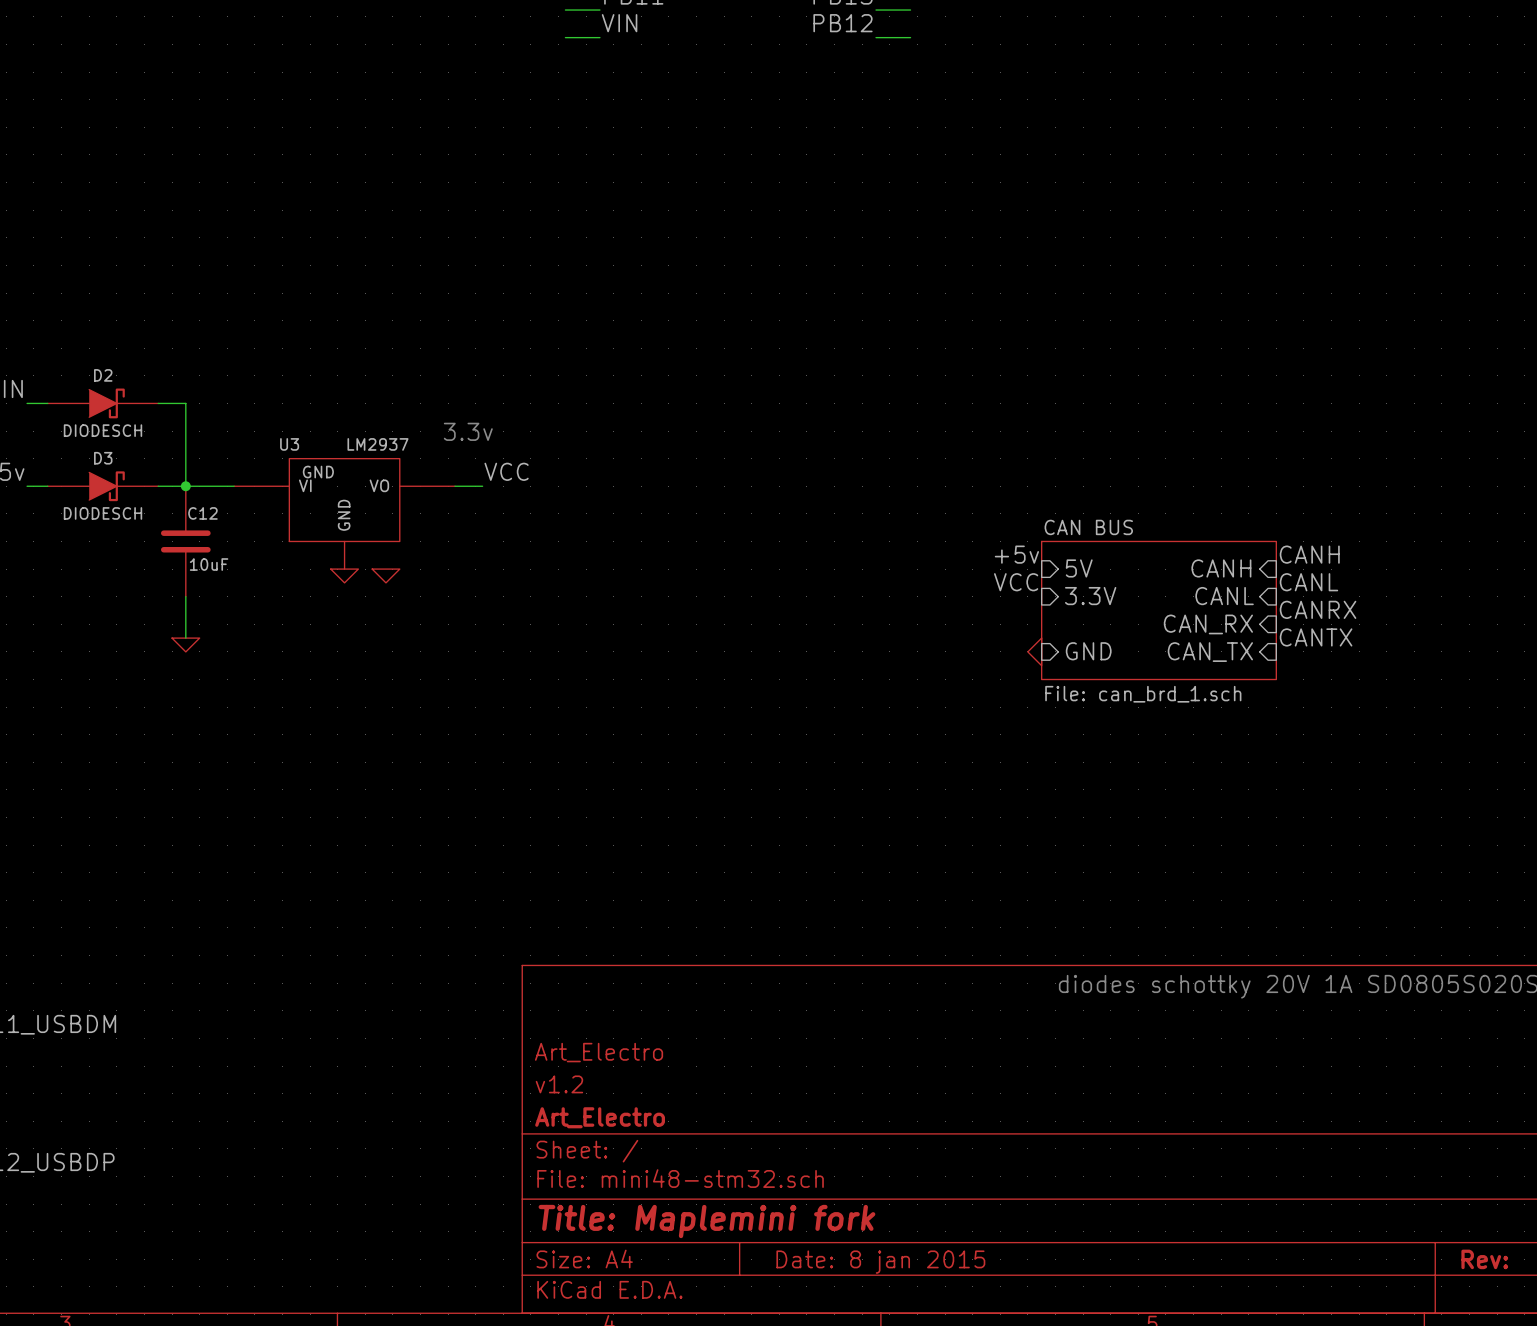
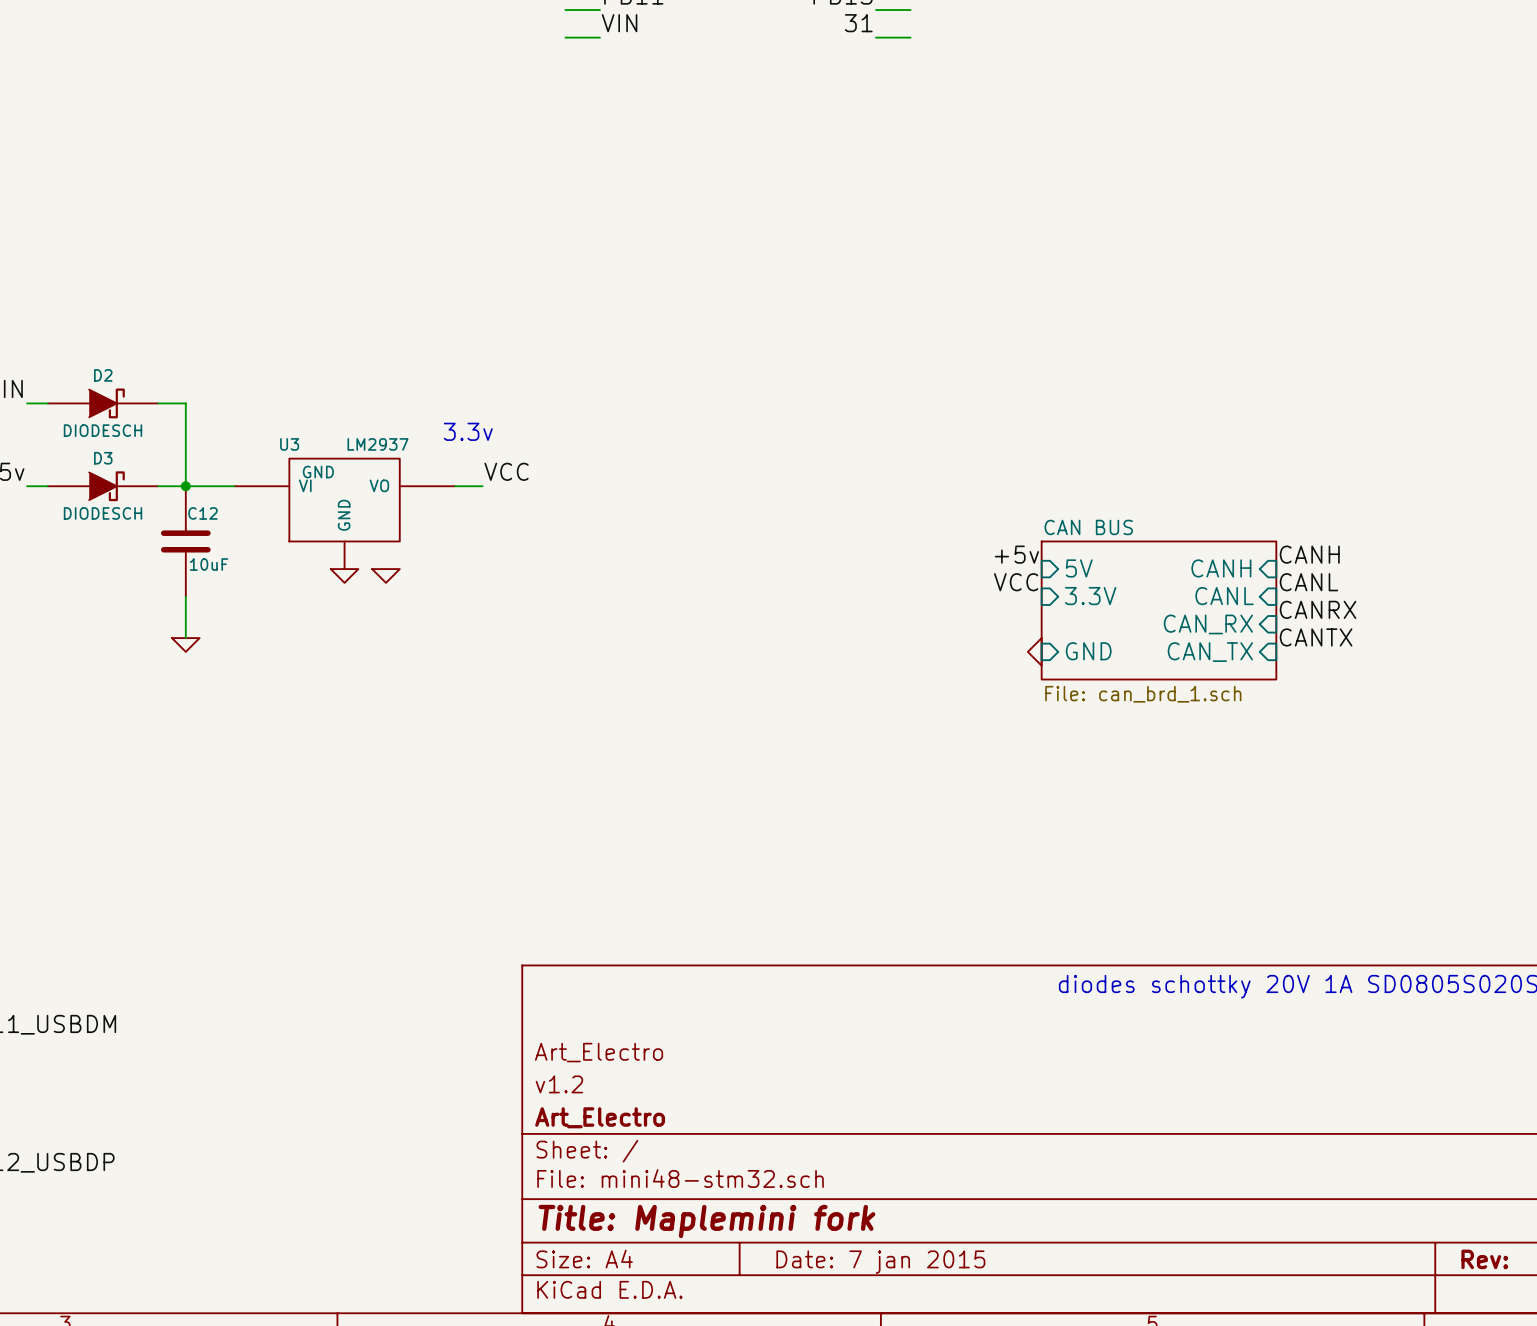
label: PB12 (842, 23) -> 31 (858, 23)
title block: Date: 8 jan 2015 (880, 1262) -> Date: 7 jan 2015 (880, 1262)

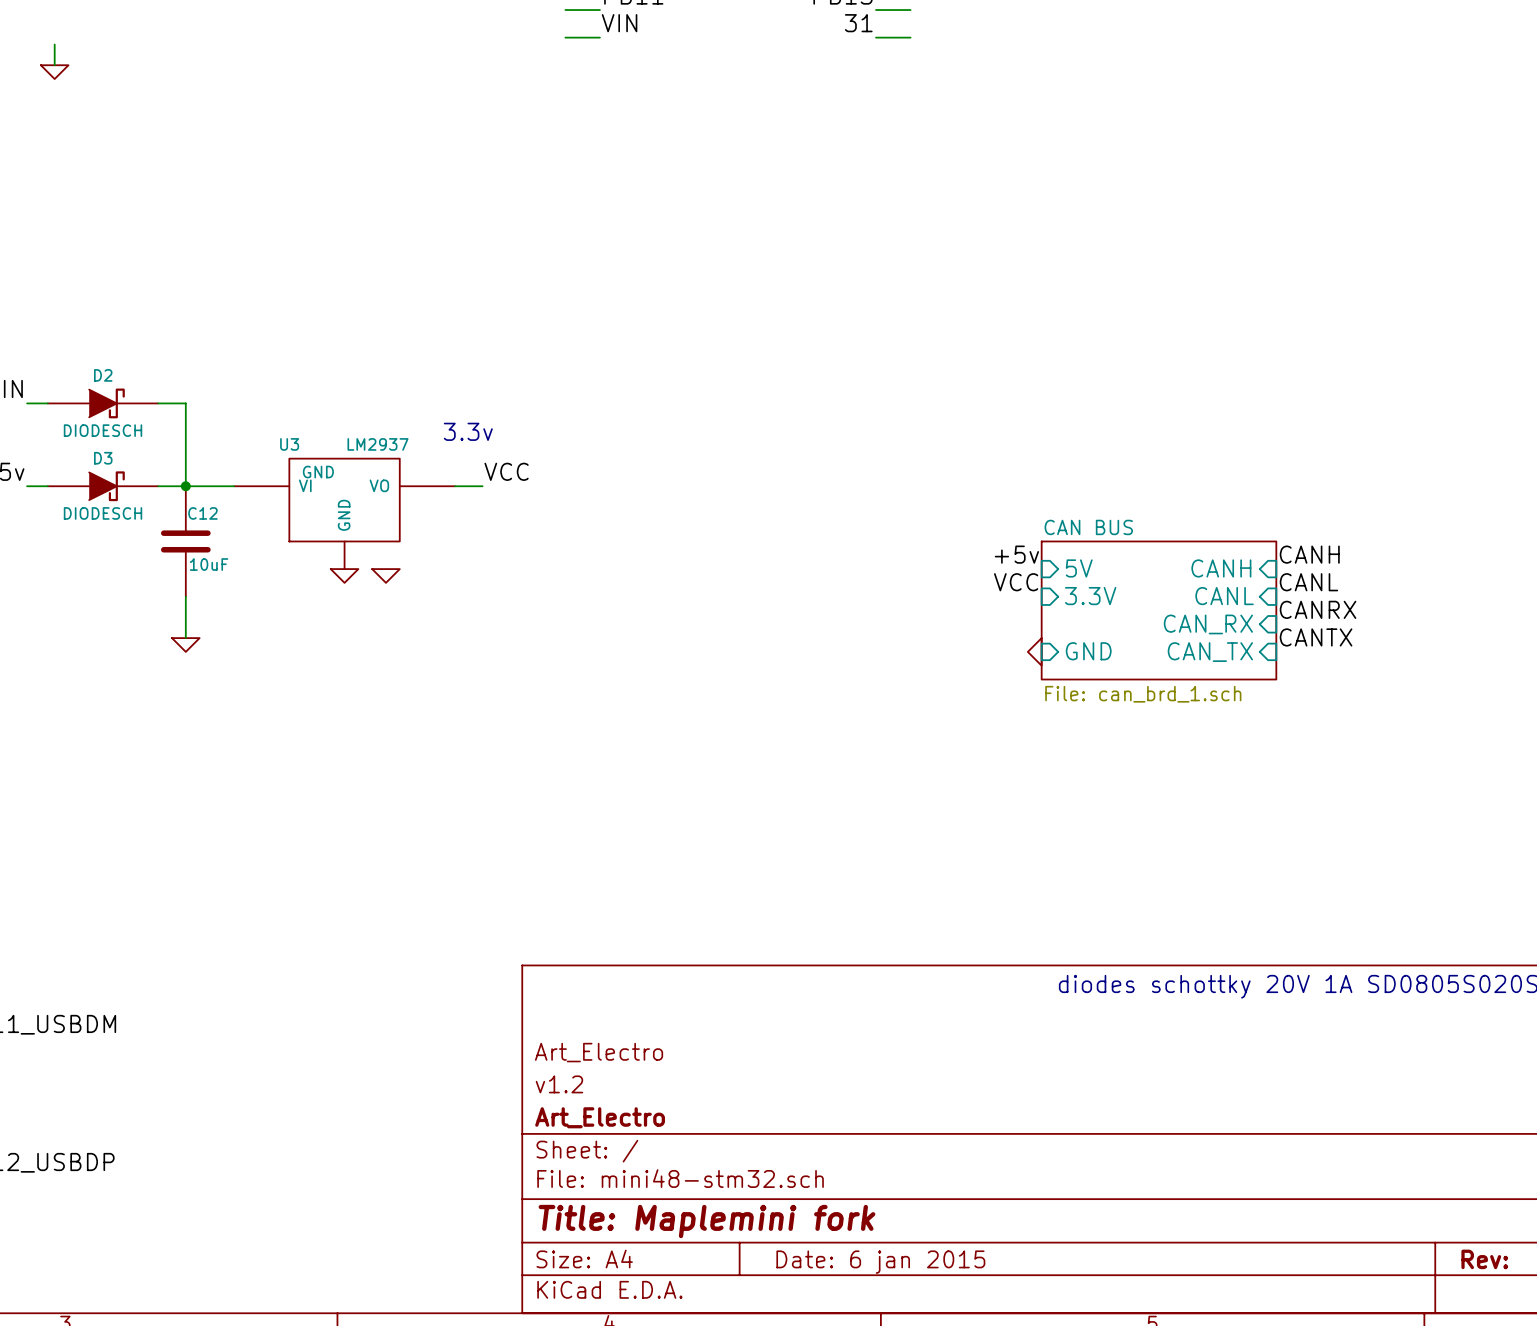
wire: none -> (54, 44) (54, 65)
power symbol: none -> (54, 72)
title block: Date: 7 jan 2015 (880, 1262) -> Date: 6 jan 2015 (880, 1262)

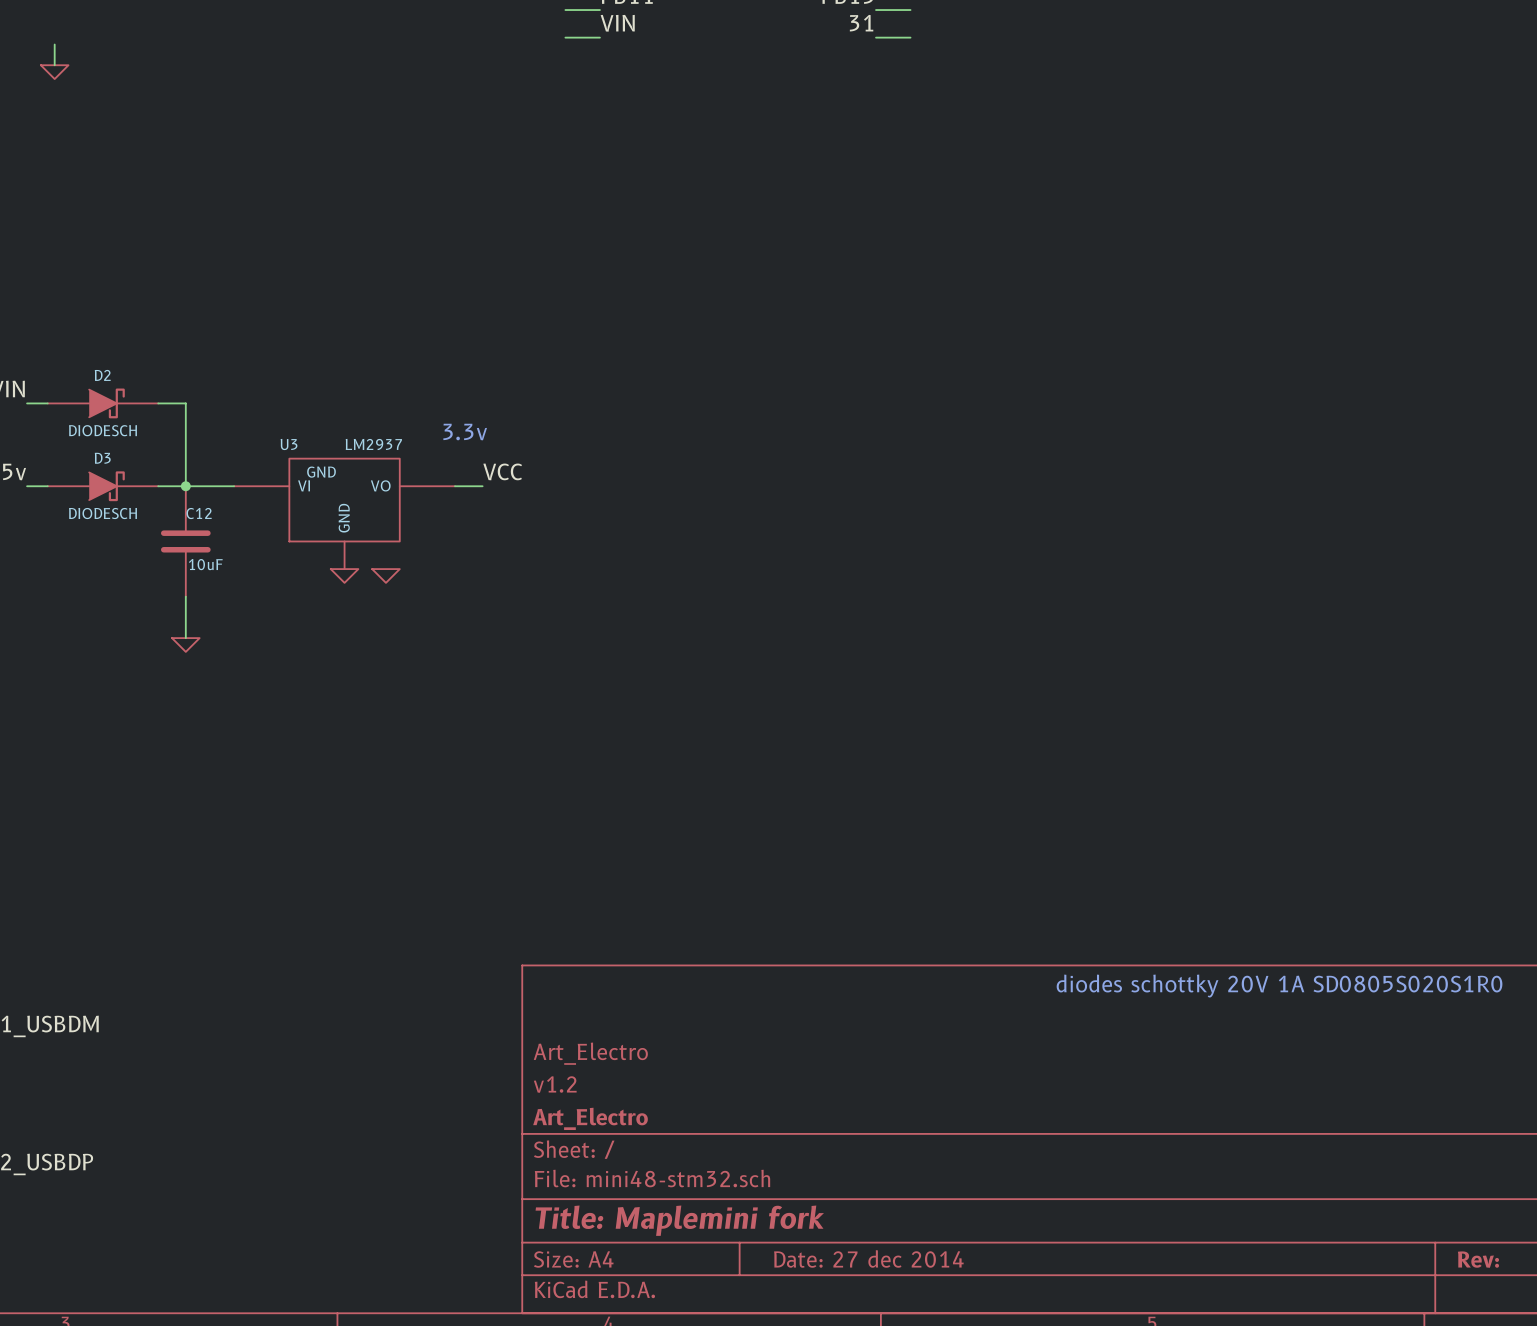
label: +5v (1016, 554) -> none
label: CANH (1309, 554) -> none
sheet pin: 5V (1079, 568) -> none
sheet pin: CANH (1221, 568) -> none
label: VCC (1016, 582) -> none
label: CANL (1308, 582) -> none
sheet pin: 3.3V (1090, 596) -> none
sheet pin: CANL (1224, 596) -> none
label: CANRX (1318, 609) -> none
sheet CAN BUS: File: can_brd_1.sch (1158, 610) -> none
sheet pin: CAN_RX (1208, 624) -> none
label: CANTX (1316, 637) -> none
power symbol: (1034, 651) -> none
sheet pin: GND (1088, 651) -> none
sheet pin: CAN_TX (1210, 652) -> none
title block: Date: 6 jan 2015 (880, 1262) -> Date: 27 dec 2014 (868, 1258)

